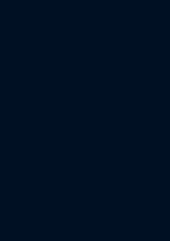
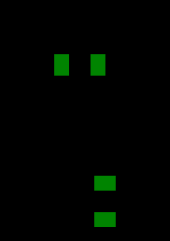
part: none -> (79, 64)
part: none -> (104, 201)

